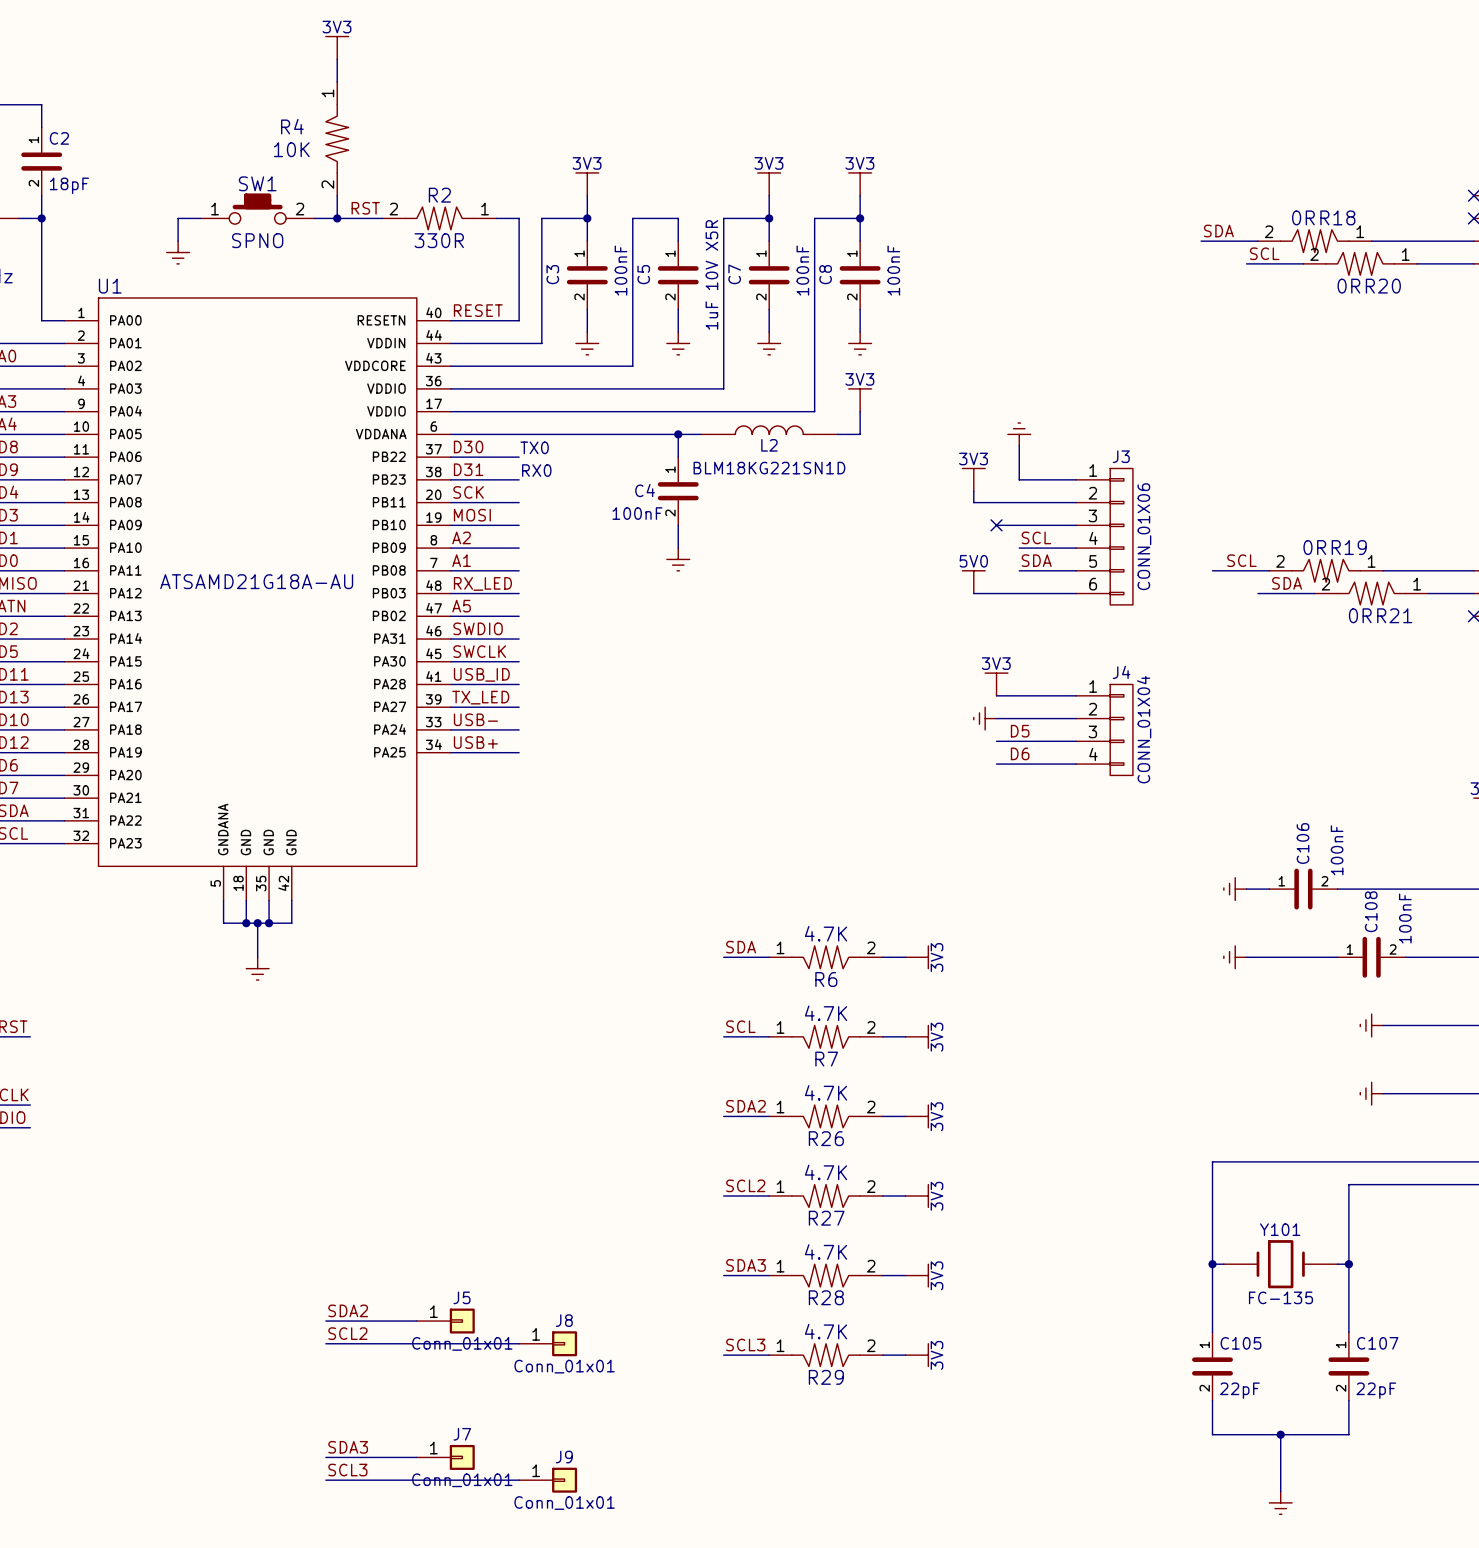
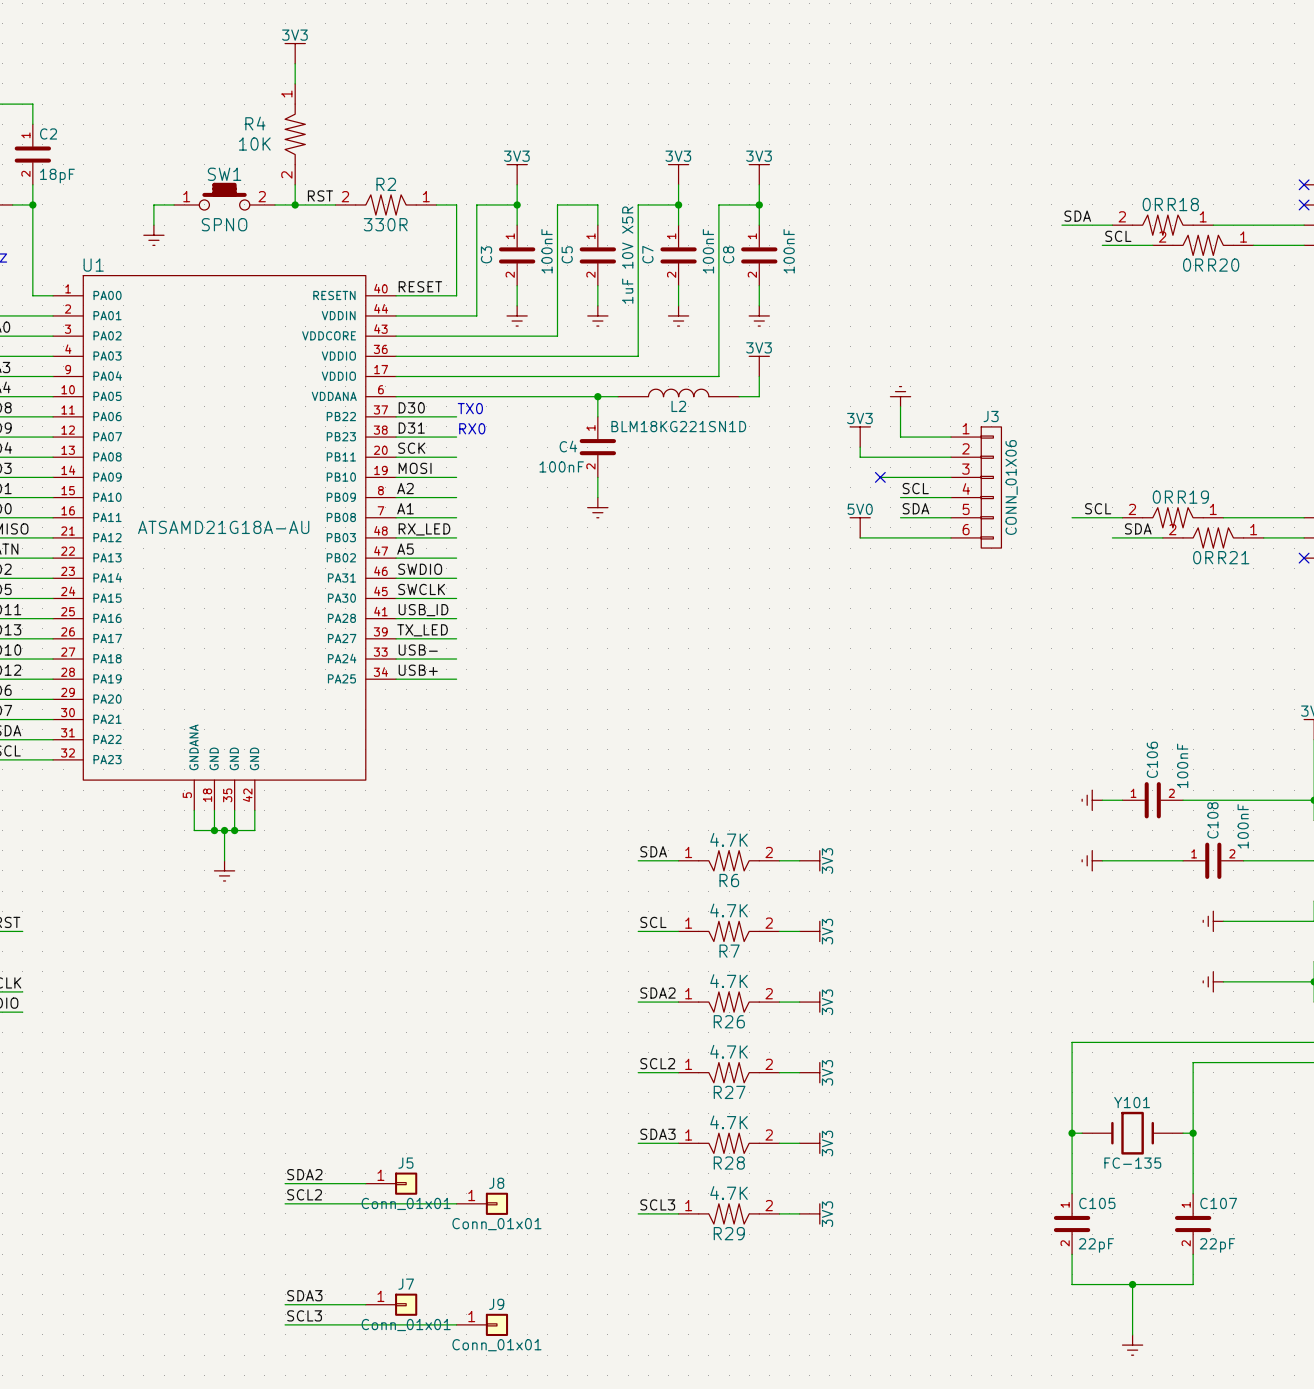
power symbol: 3V3 (996, 684) -> none
wire: (996, 695) (1076, 695) -> none
power symbol: (985, 718) -> none
wire: (996, 718) (1076, 718) -> none
J4: CONN_01X04 (1104, 729) -> none
label: D5 (1020, 731) -> none
wire: (996, 741) (1076, 741) -> none
label: D6 (1020, 753) -> none
wire: (996, 764) (1076, 764) -> none

